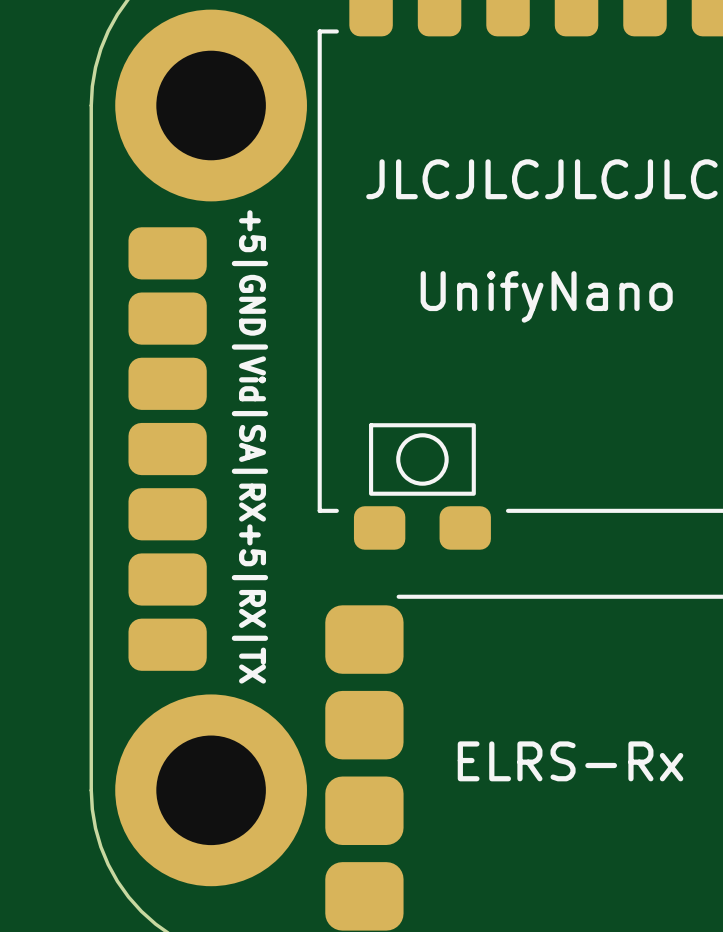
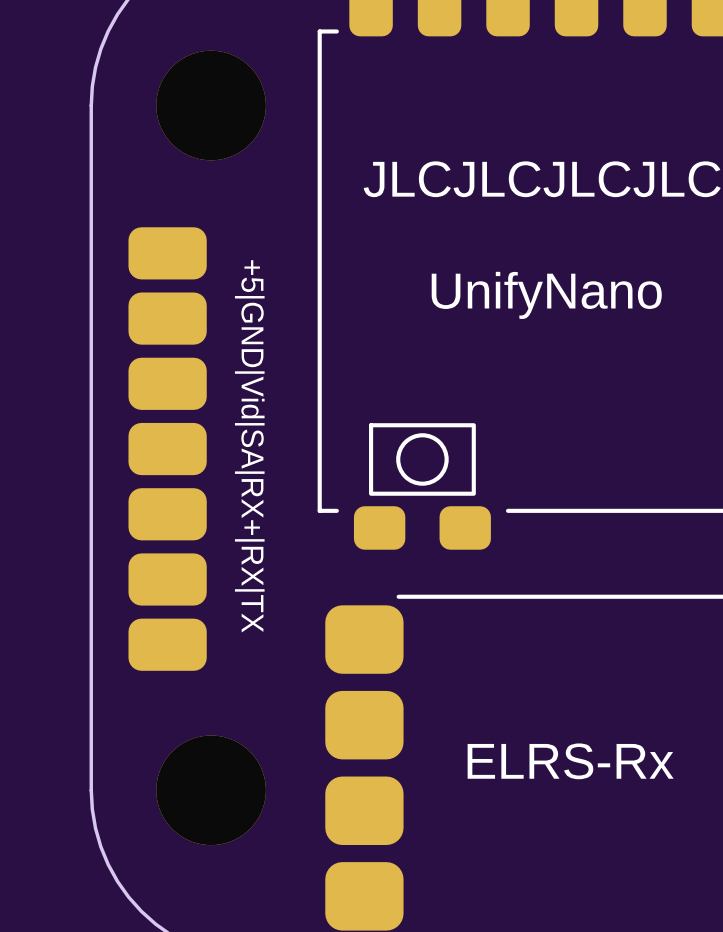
part footprint: [115, 9, 307, 202] -> [156, 50, 266, 161]
text: +5|GND|Vid|SA|RX+5|RX|TX (249, 446) -> +5|GND|Vid|SA|RX+|RX|TX (249, 446)
part footprint: [115, 694, 307, 887] -> [156, 735, 266, 846]

